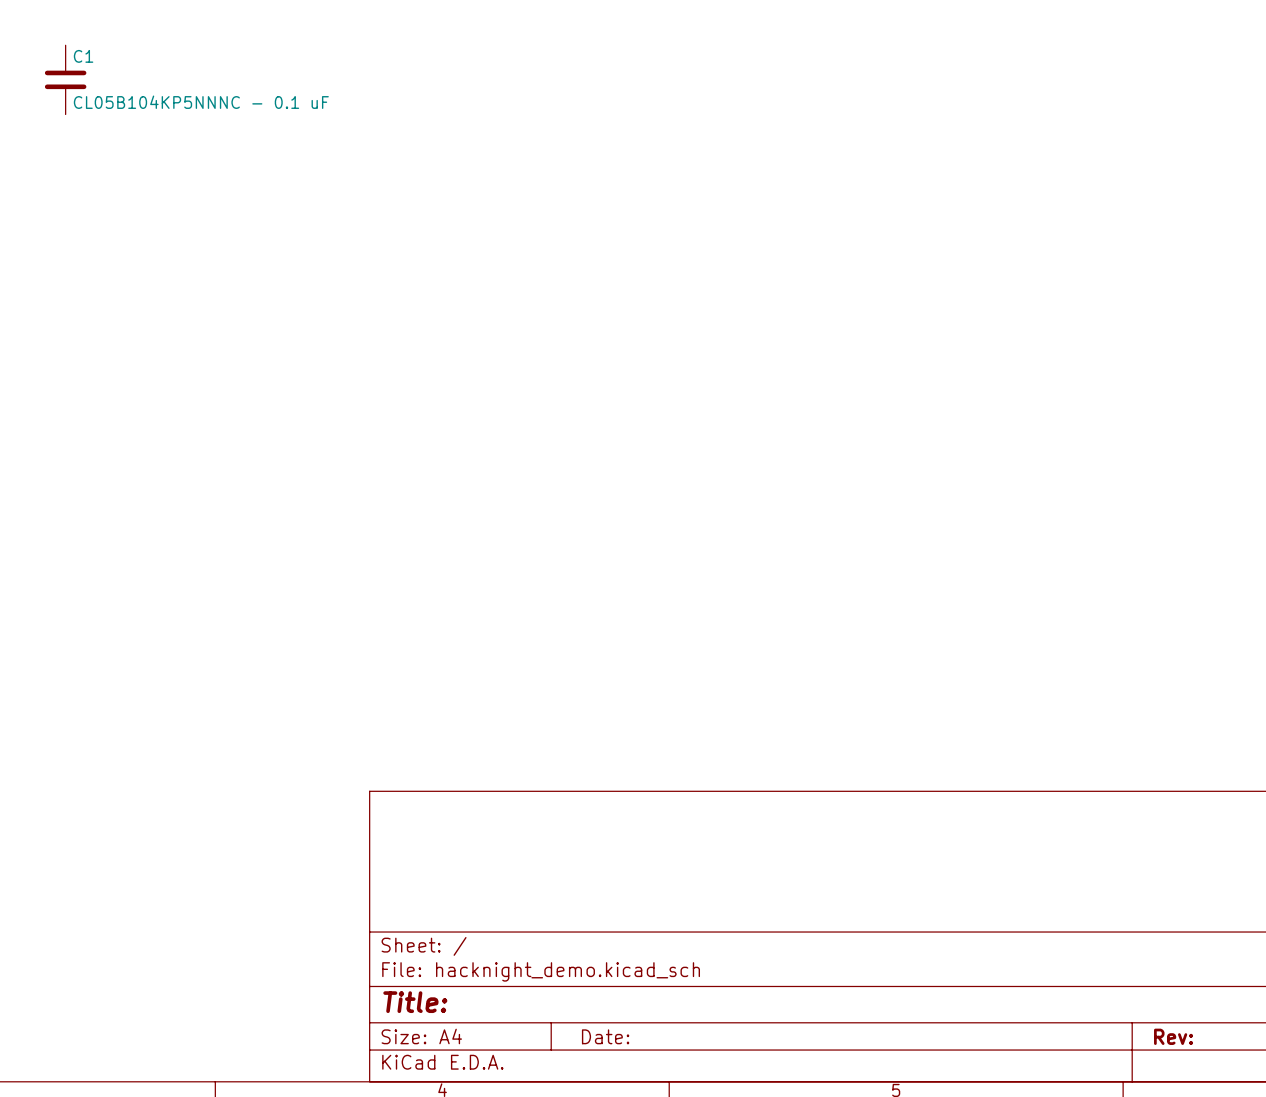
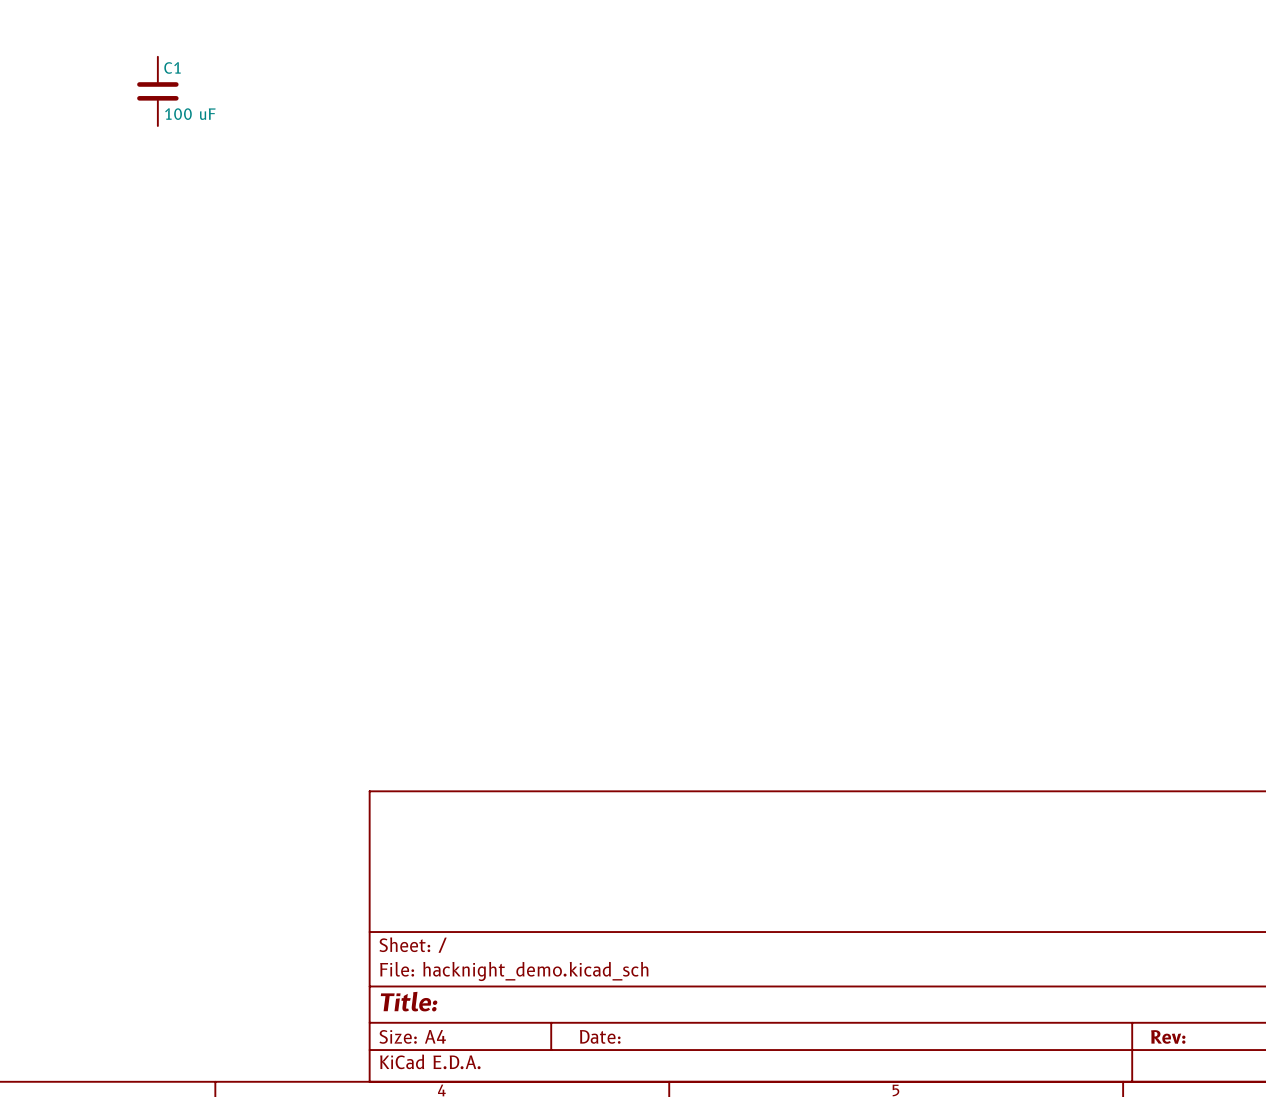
C1 position: (65, 79) -> (157, 91)
C1 value: CL05B104KP5NNNC - 0.1 uF (201, 102) -> 100 uF (190, 114)

